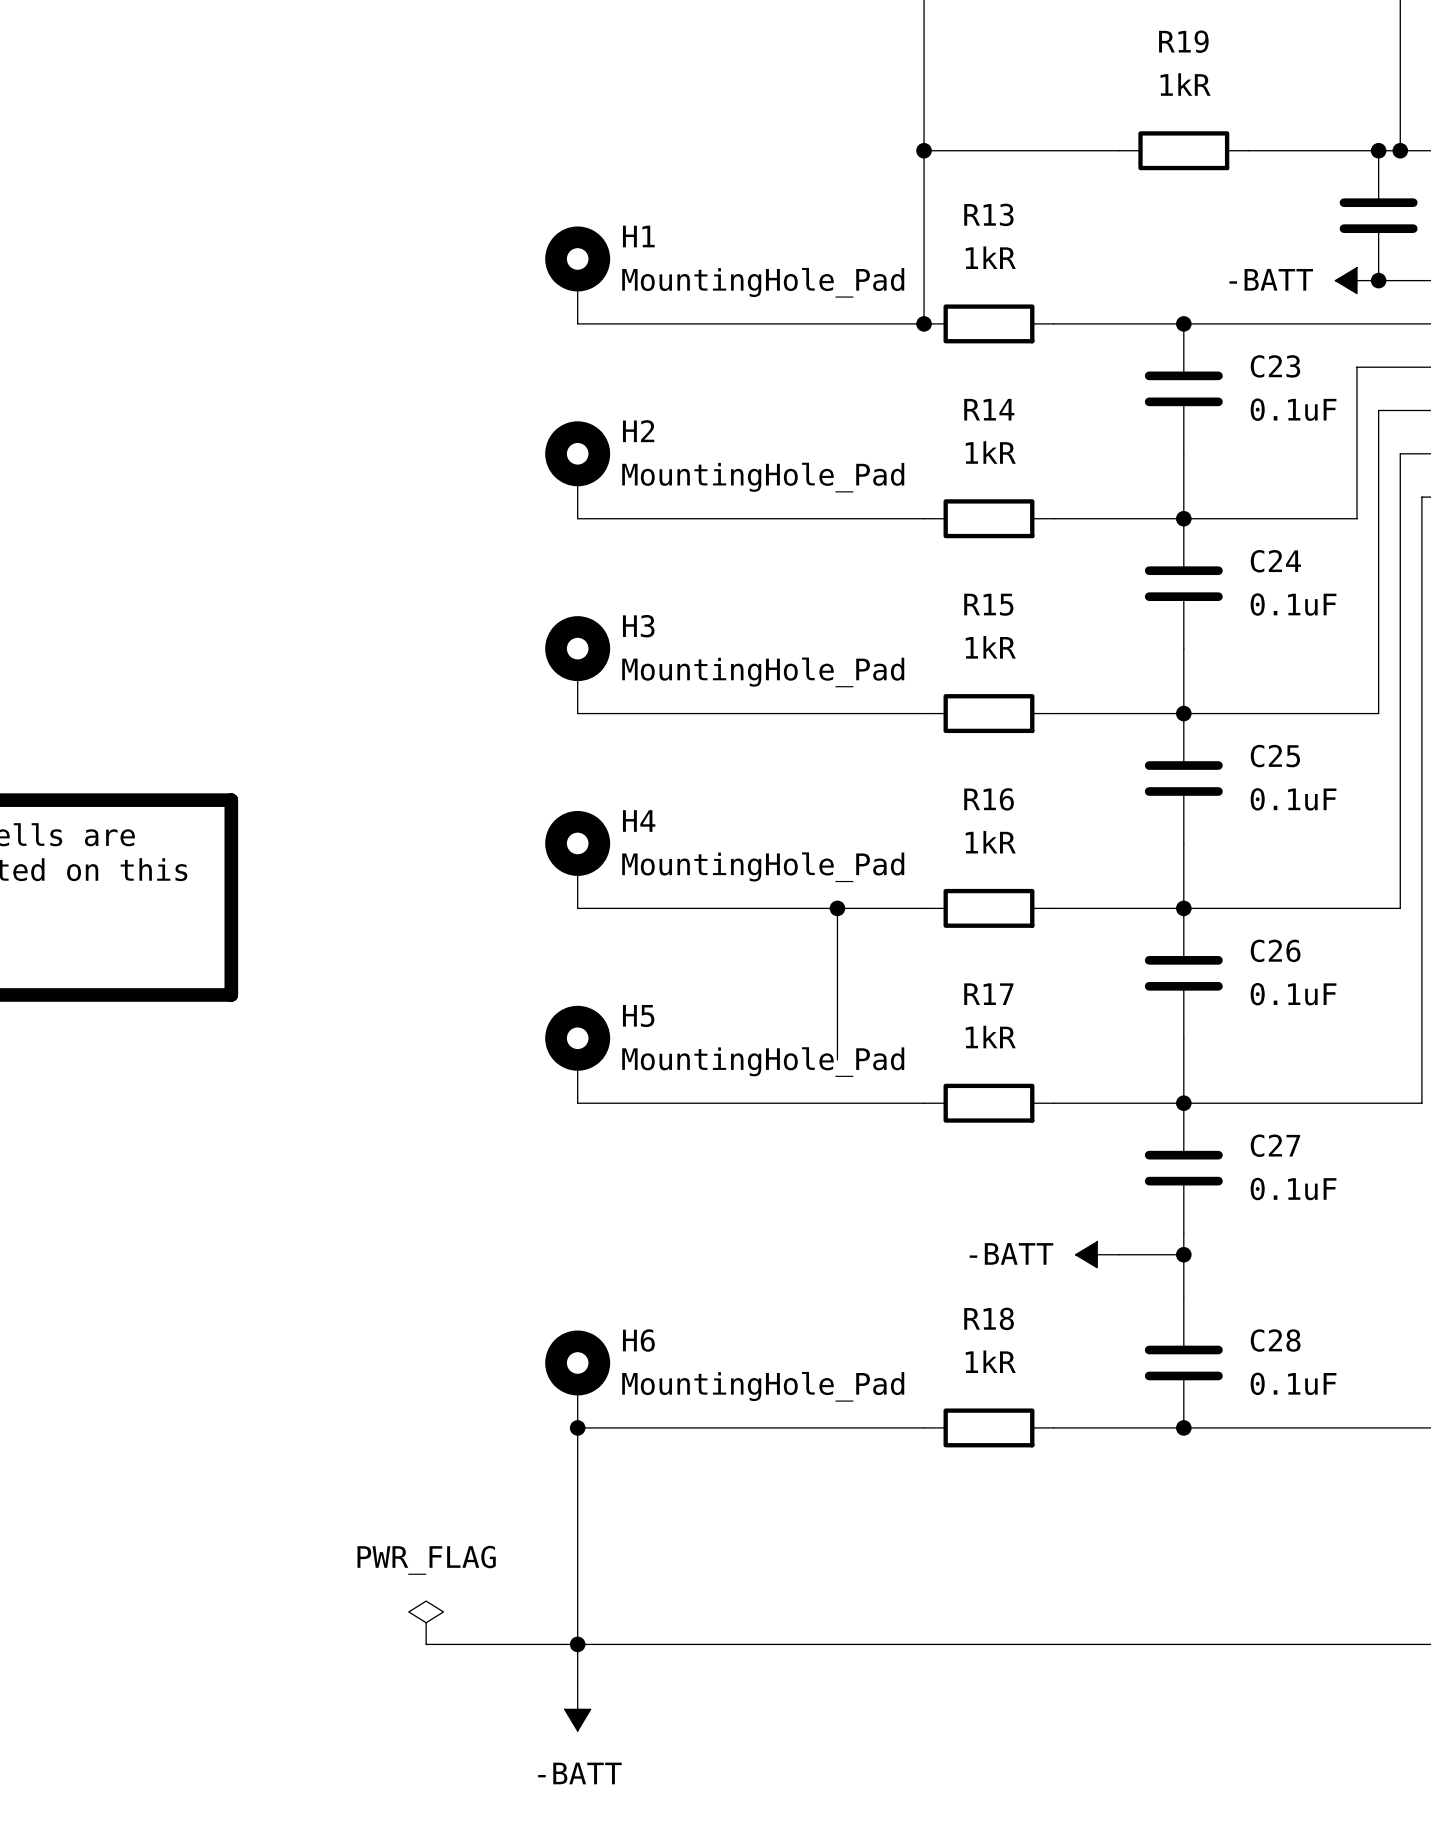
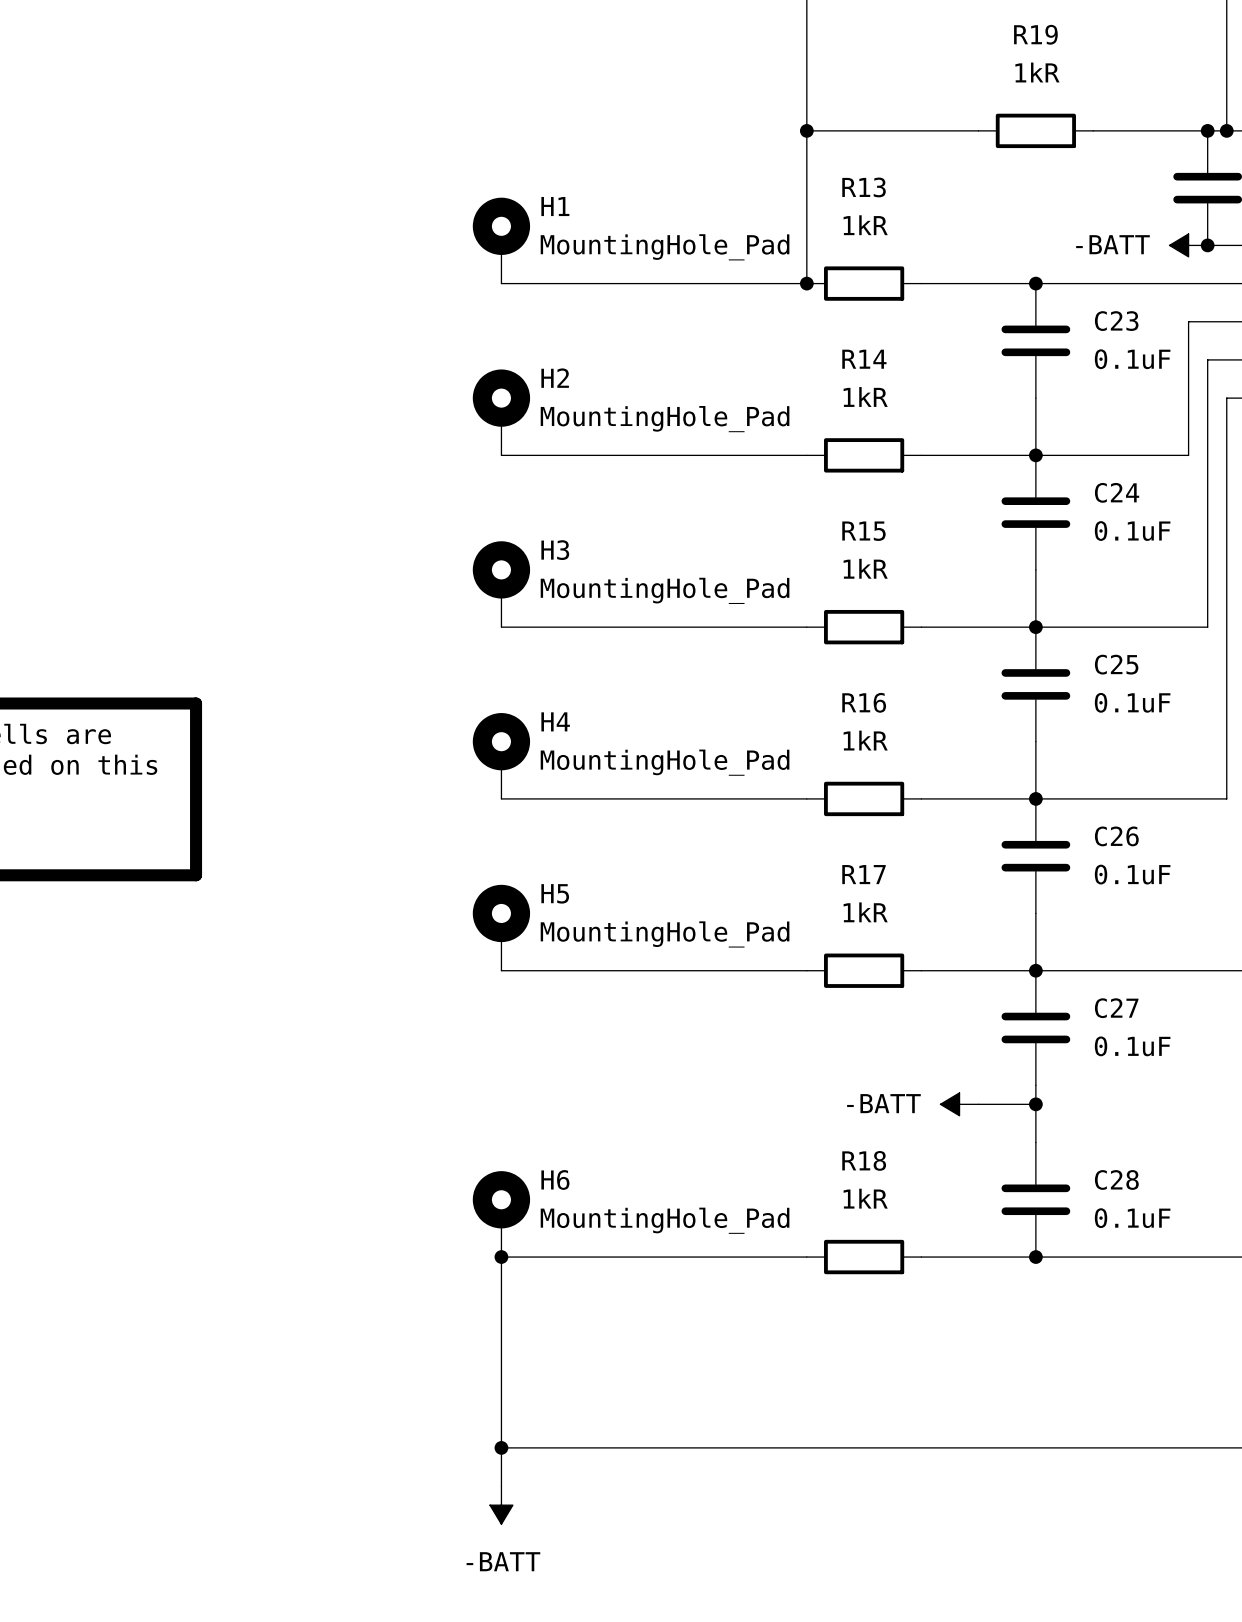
wire: (837, 908) (837, 1059) -> none
junction: (837, 908) -> none
power symbol: PWR_FLAG (426, 1622) -> none
wire: (426, 1644) (577, 1644) -> none

